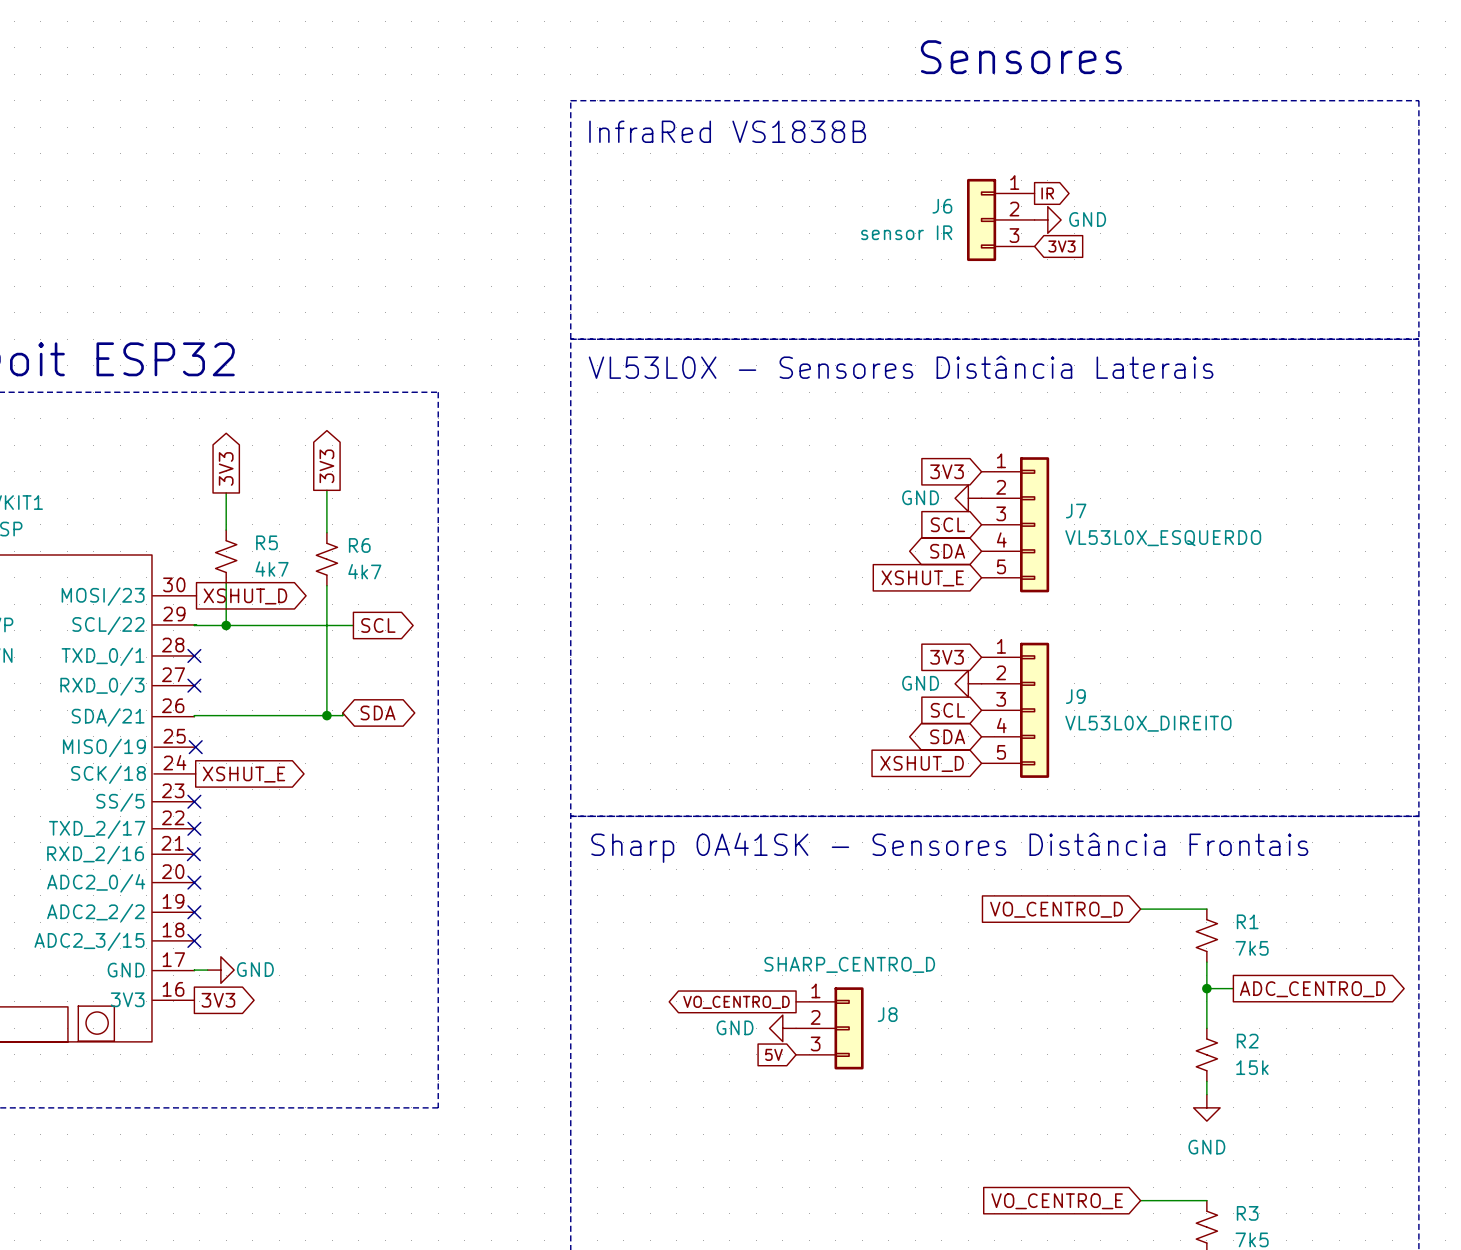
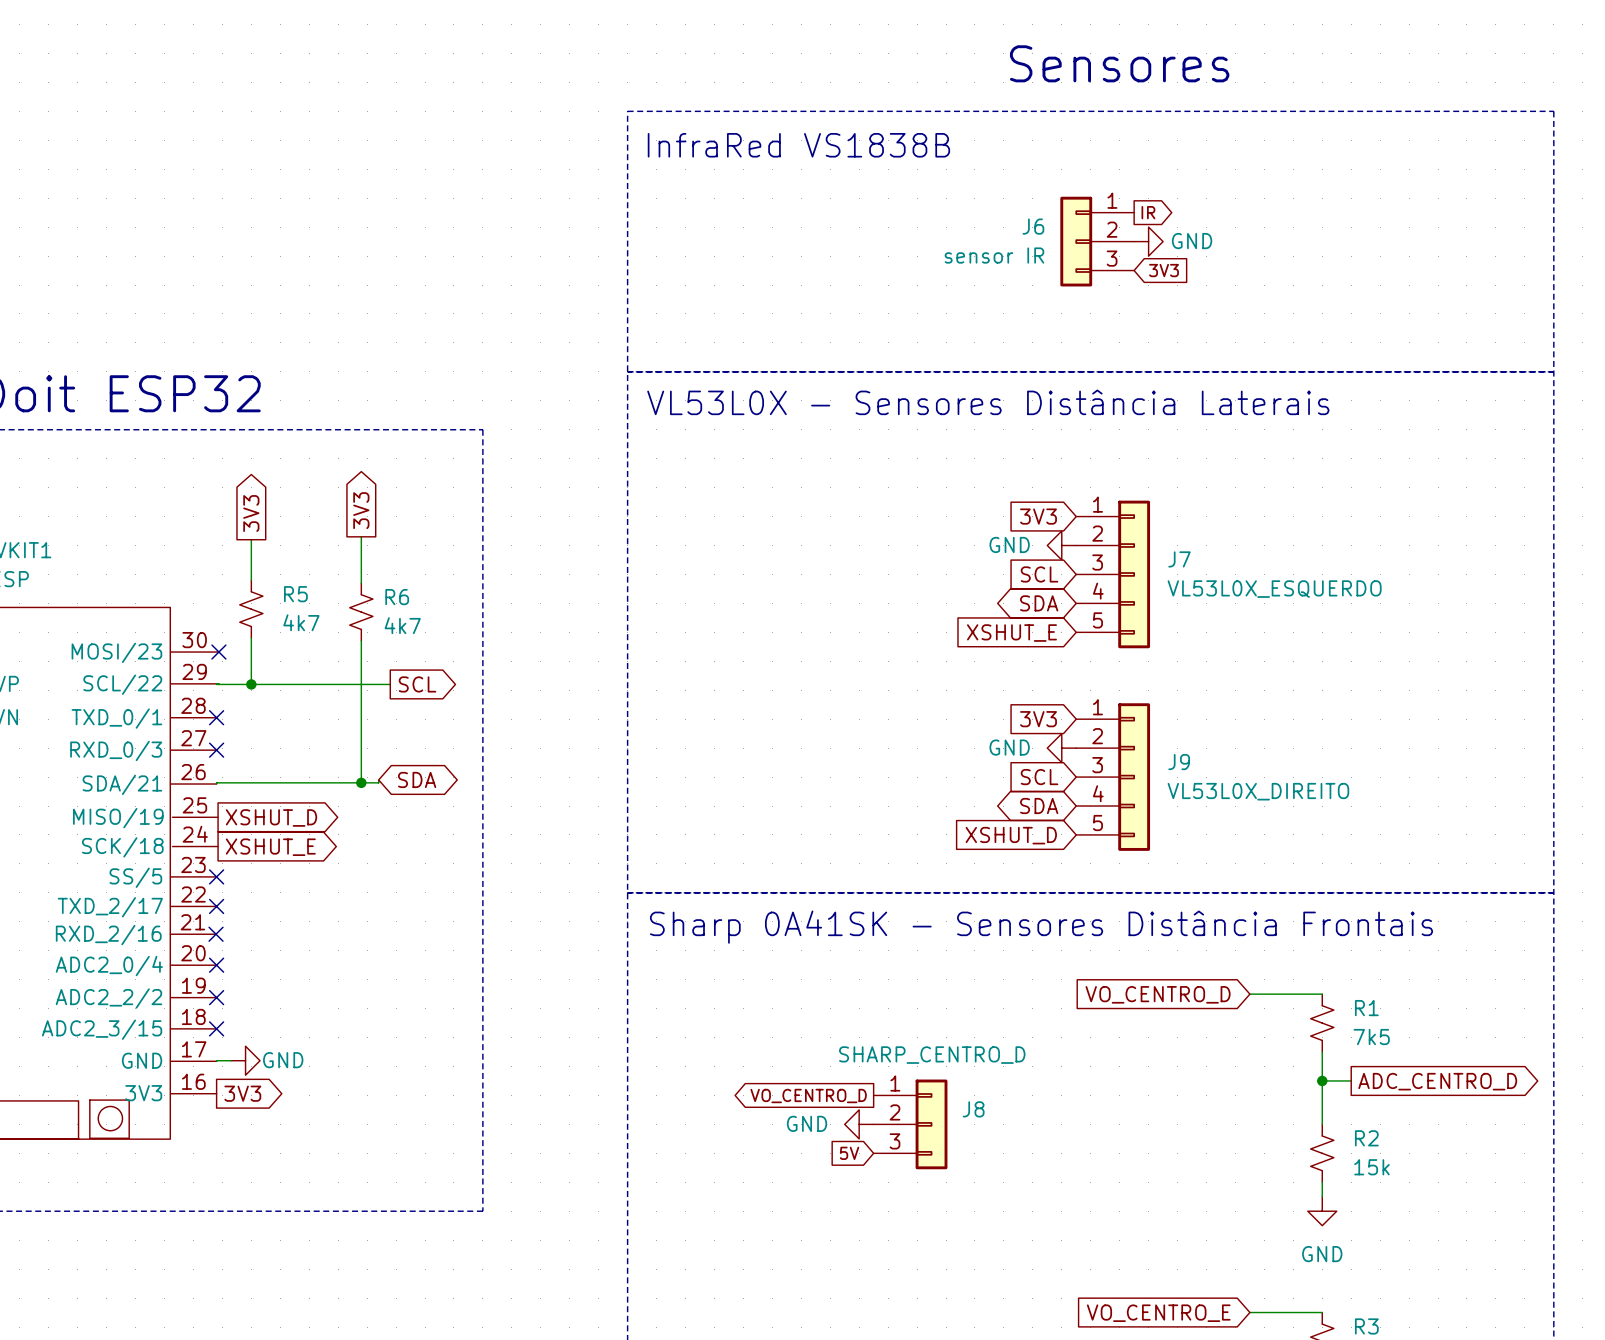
no-connect mark: none -> (218, 652)
global label position: XSHUT_D (245, 596) -> XSHUT_D (271, 817)
no-connect mark: (195, 747) -> none

